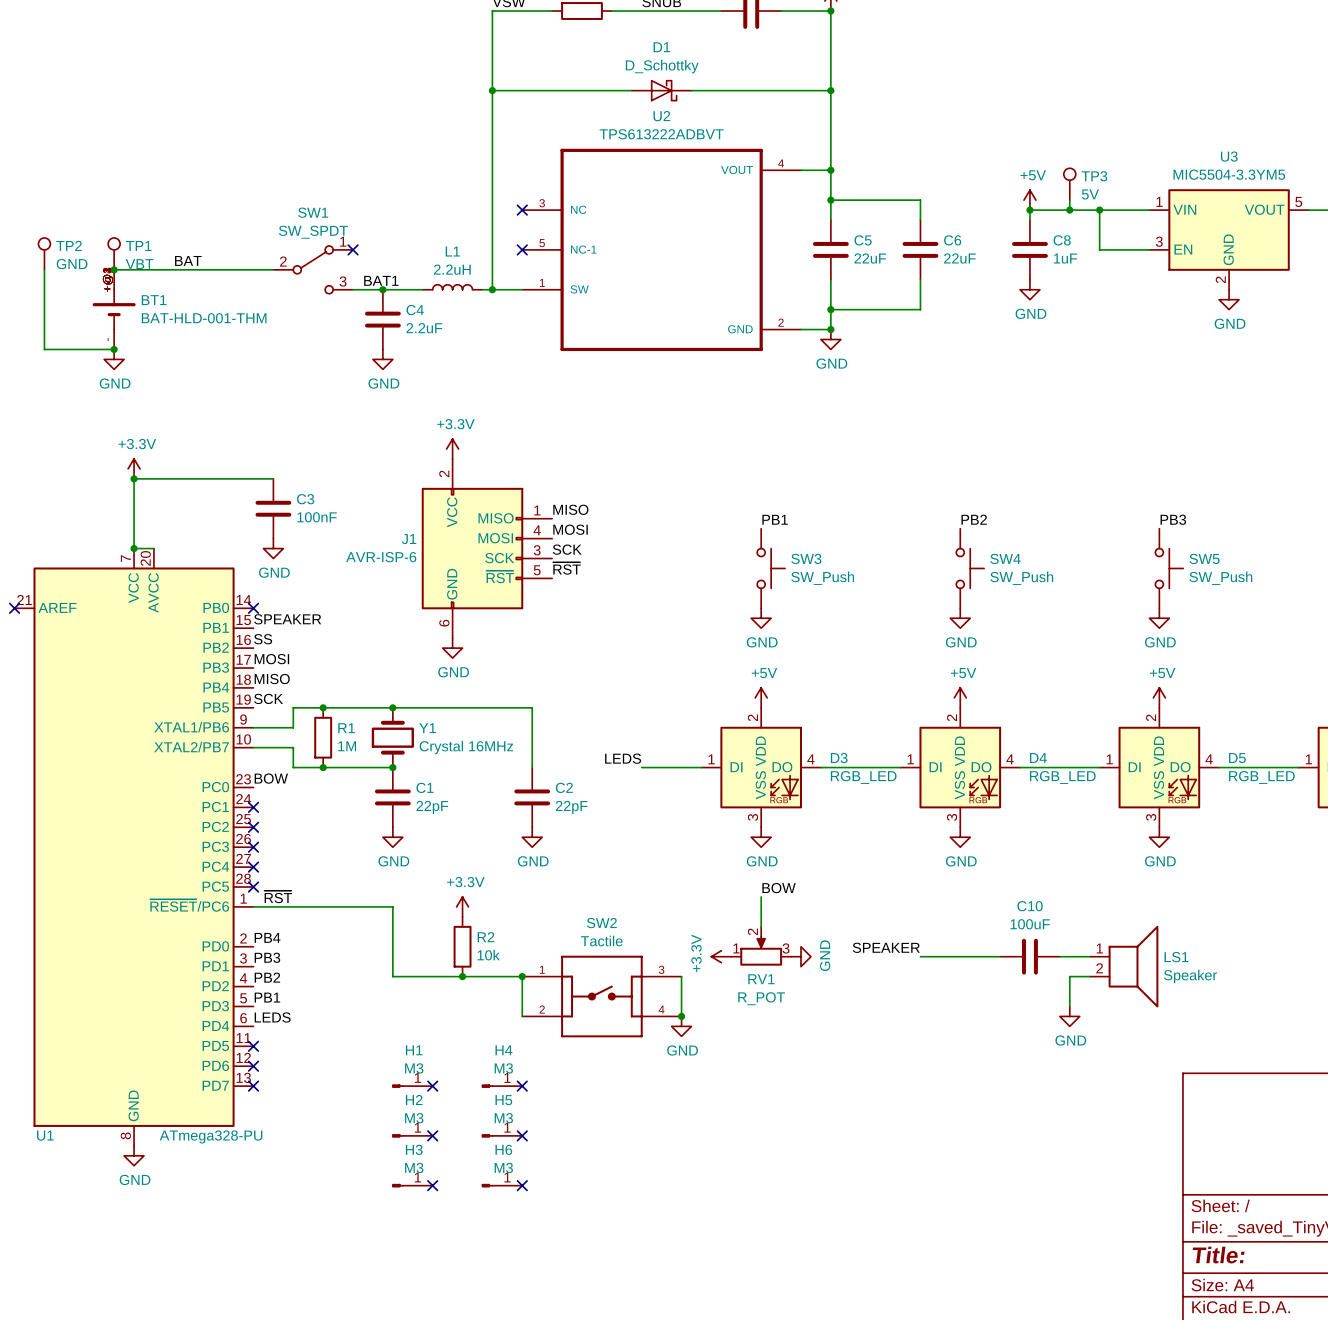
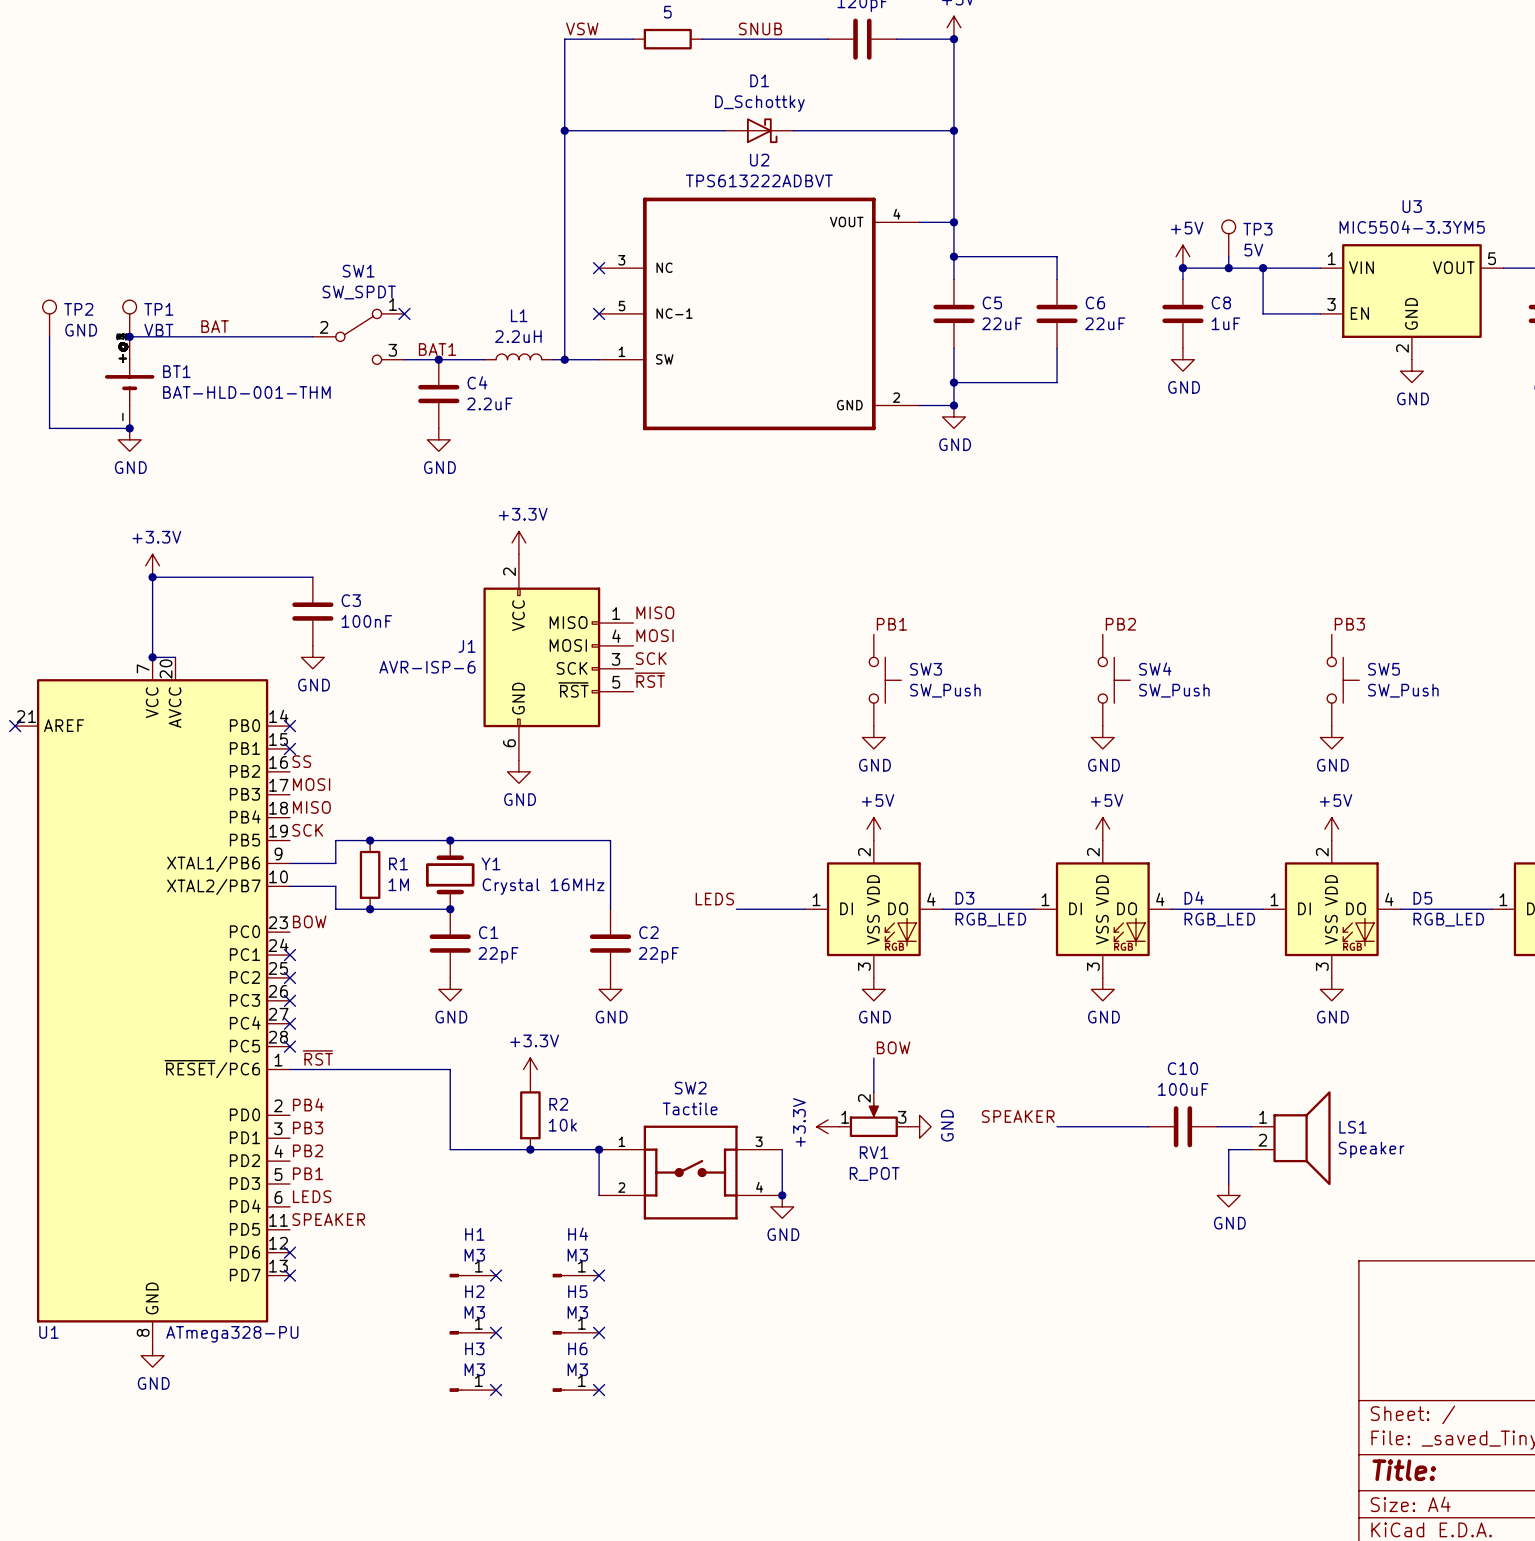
label: SPEAKER (287, 619) -> none
no-connect mark: none -> (289, 748)
label: none -> SPEAKER (328, 1219)
no-connect mark: (253, 1046) -> none

